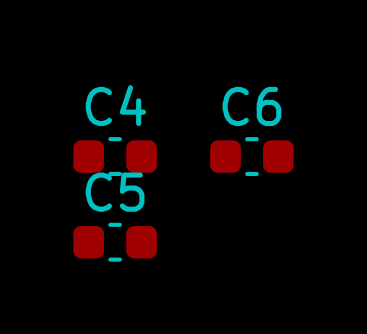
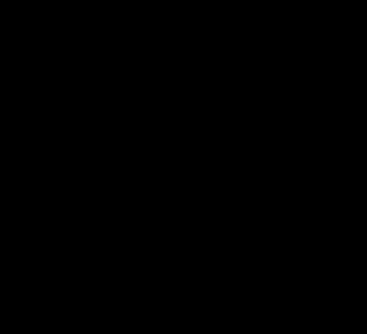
C4: (115, 156) -> none
C6: (251, 156) -> none
C5: (115, 242) -> none

